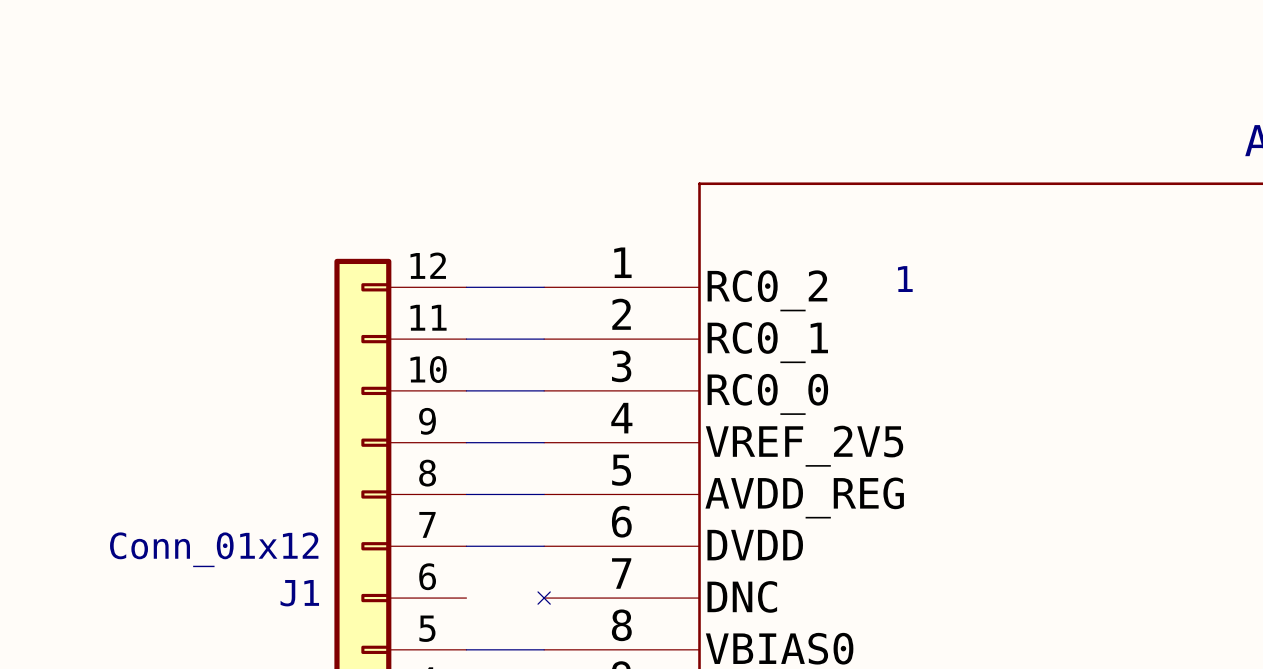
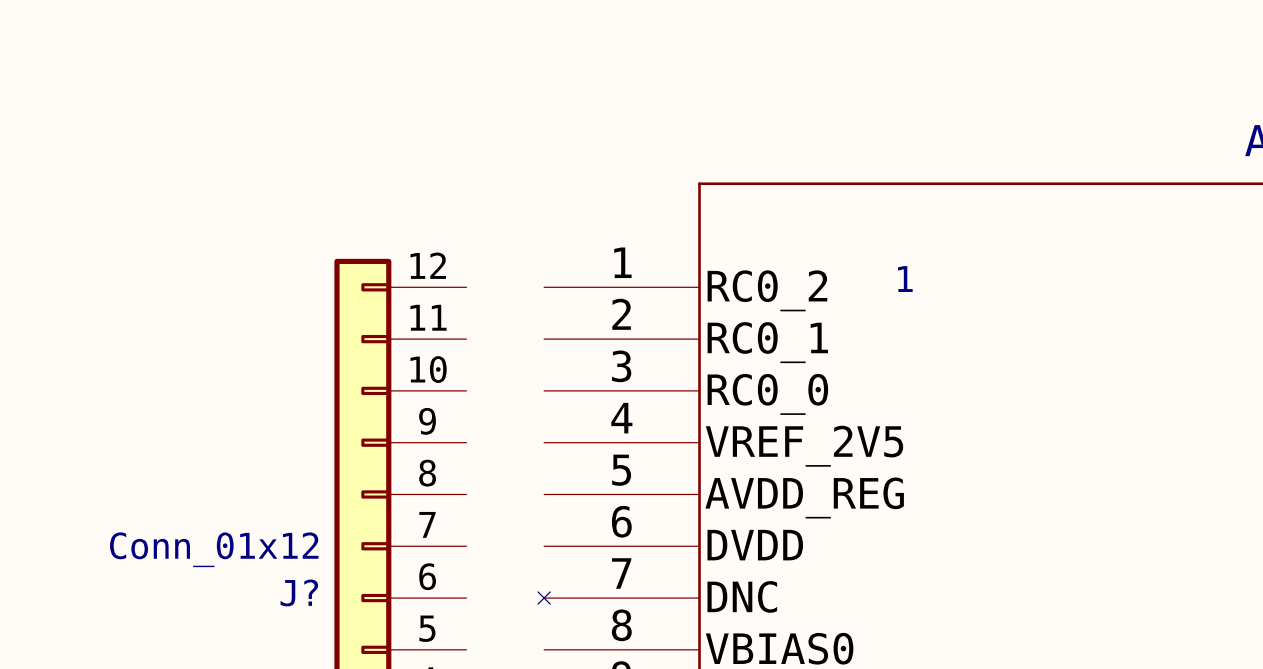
wire: (466, 287) (544, 287) -> none
wire: (466, 339) (544, 339) -> none
wire: (466, 390) (544, 390) -> none
wire: (466, 442) (544, 442) -> none
wire: (466, 494) (544, 494) -> none
wire: (466, 546) (544, 546) -> none
J1 name: J1 (299, 593) -> J? (299, 592)
wire: (466, 649) (544, 649) -> none

